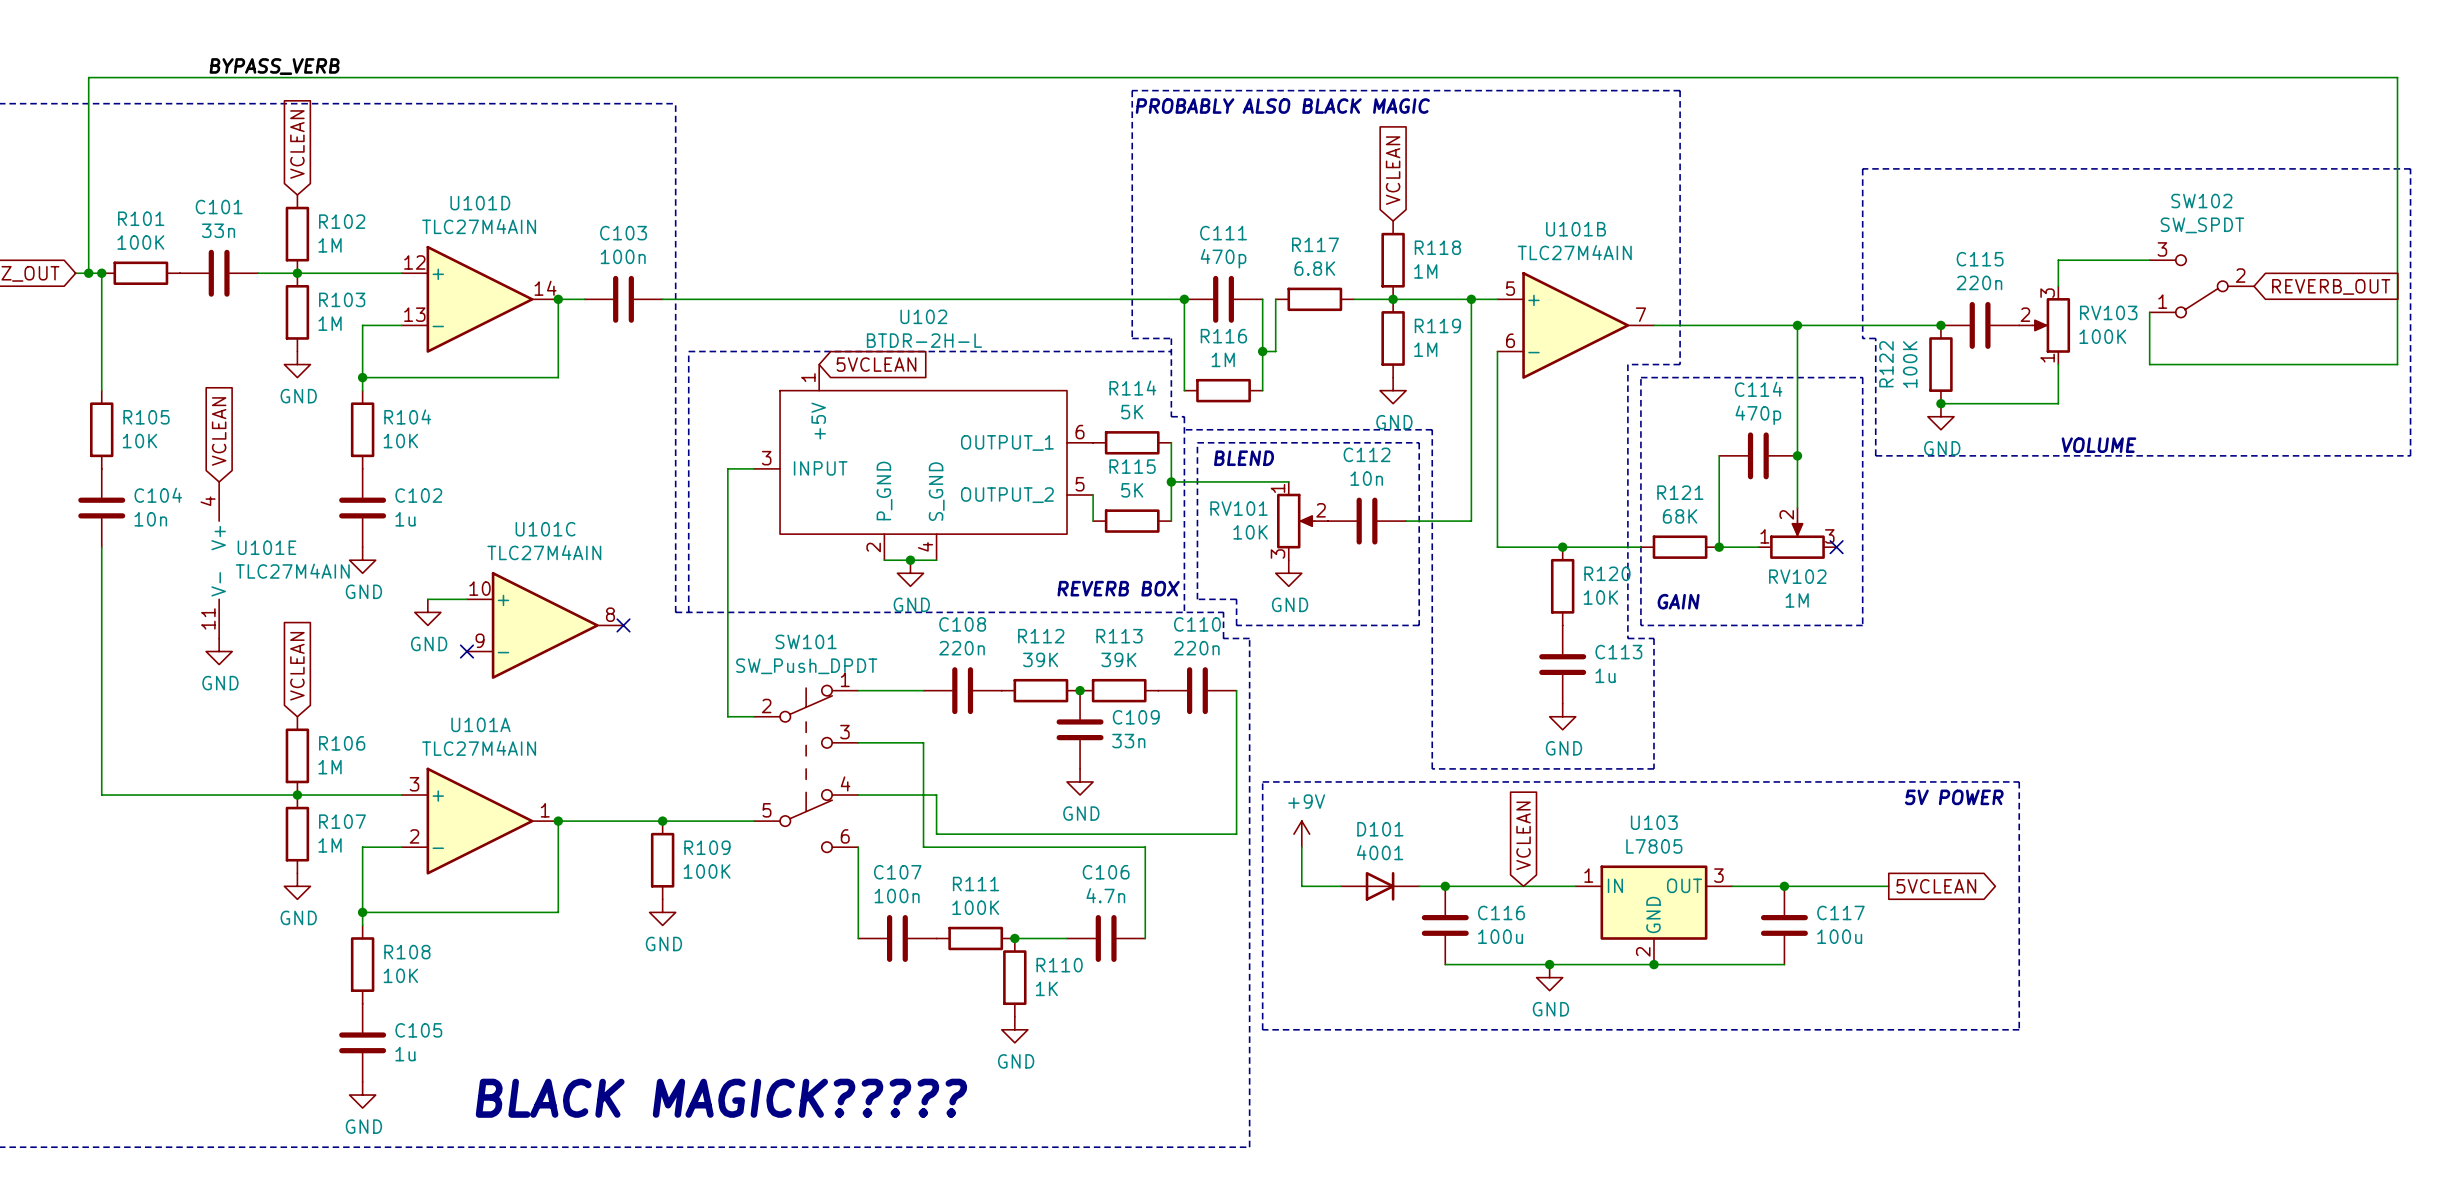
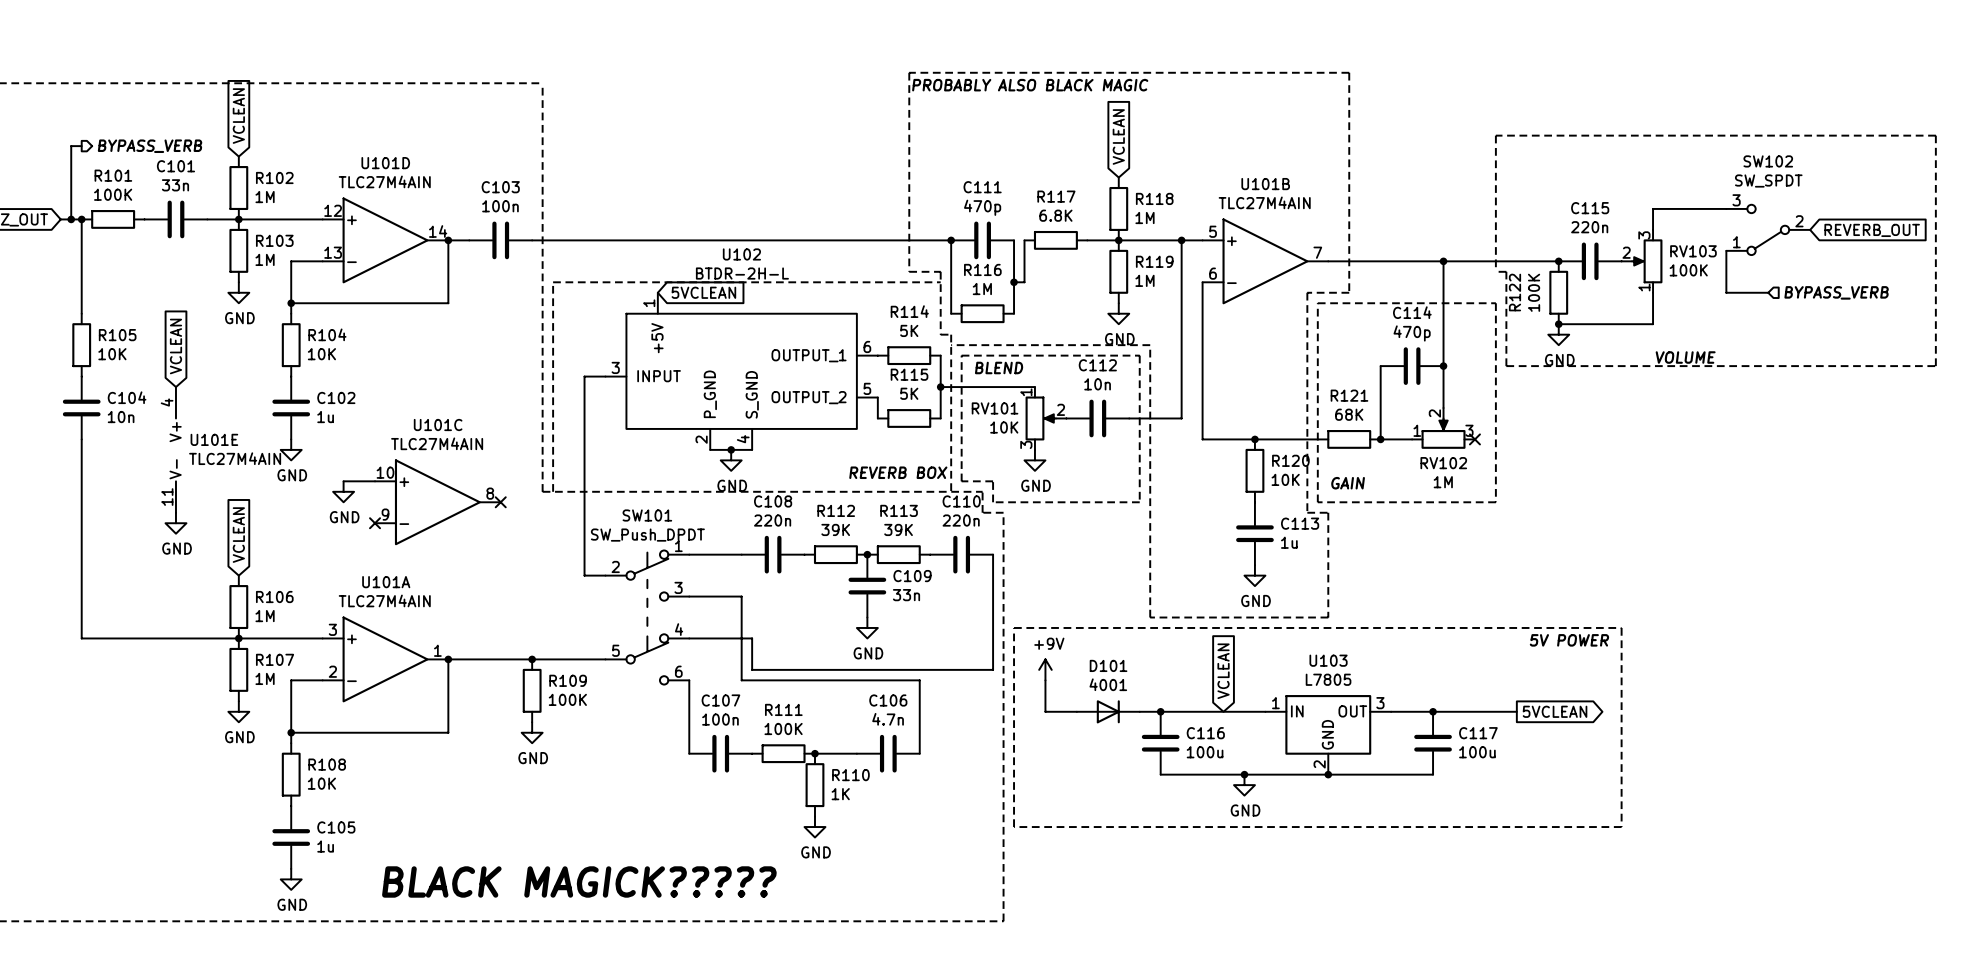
label: BYPASS_VERB (274, 66) -> none
wire: (88, 181) (88, 77) (2397, 77) (2397, 364) (2201, 364) -> (71, 146) (81, 146)
hierarchical label: none -> BYPASS_VERB (150, 146)
hierarchical label: none -> BYPASS_VERB (1836, 292)

